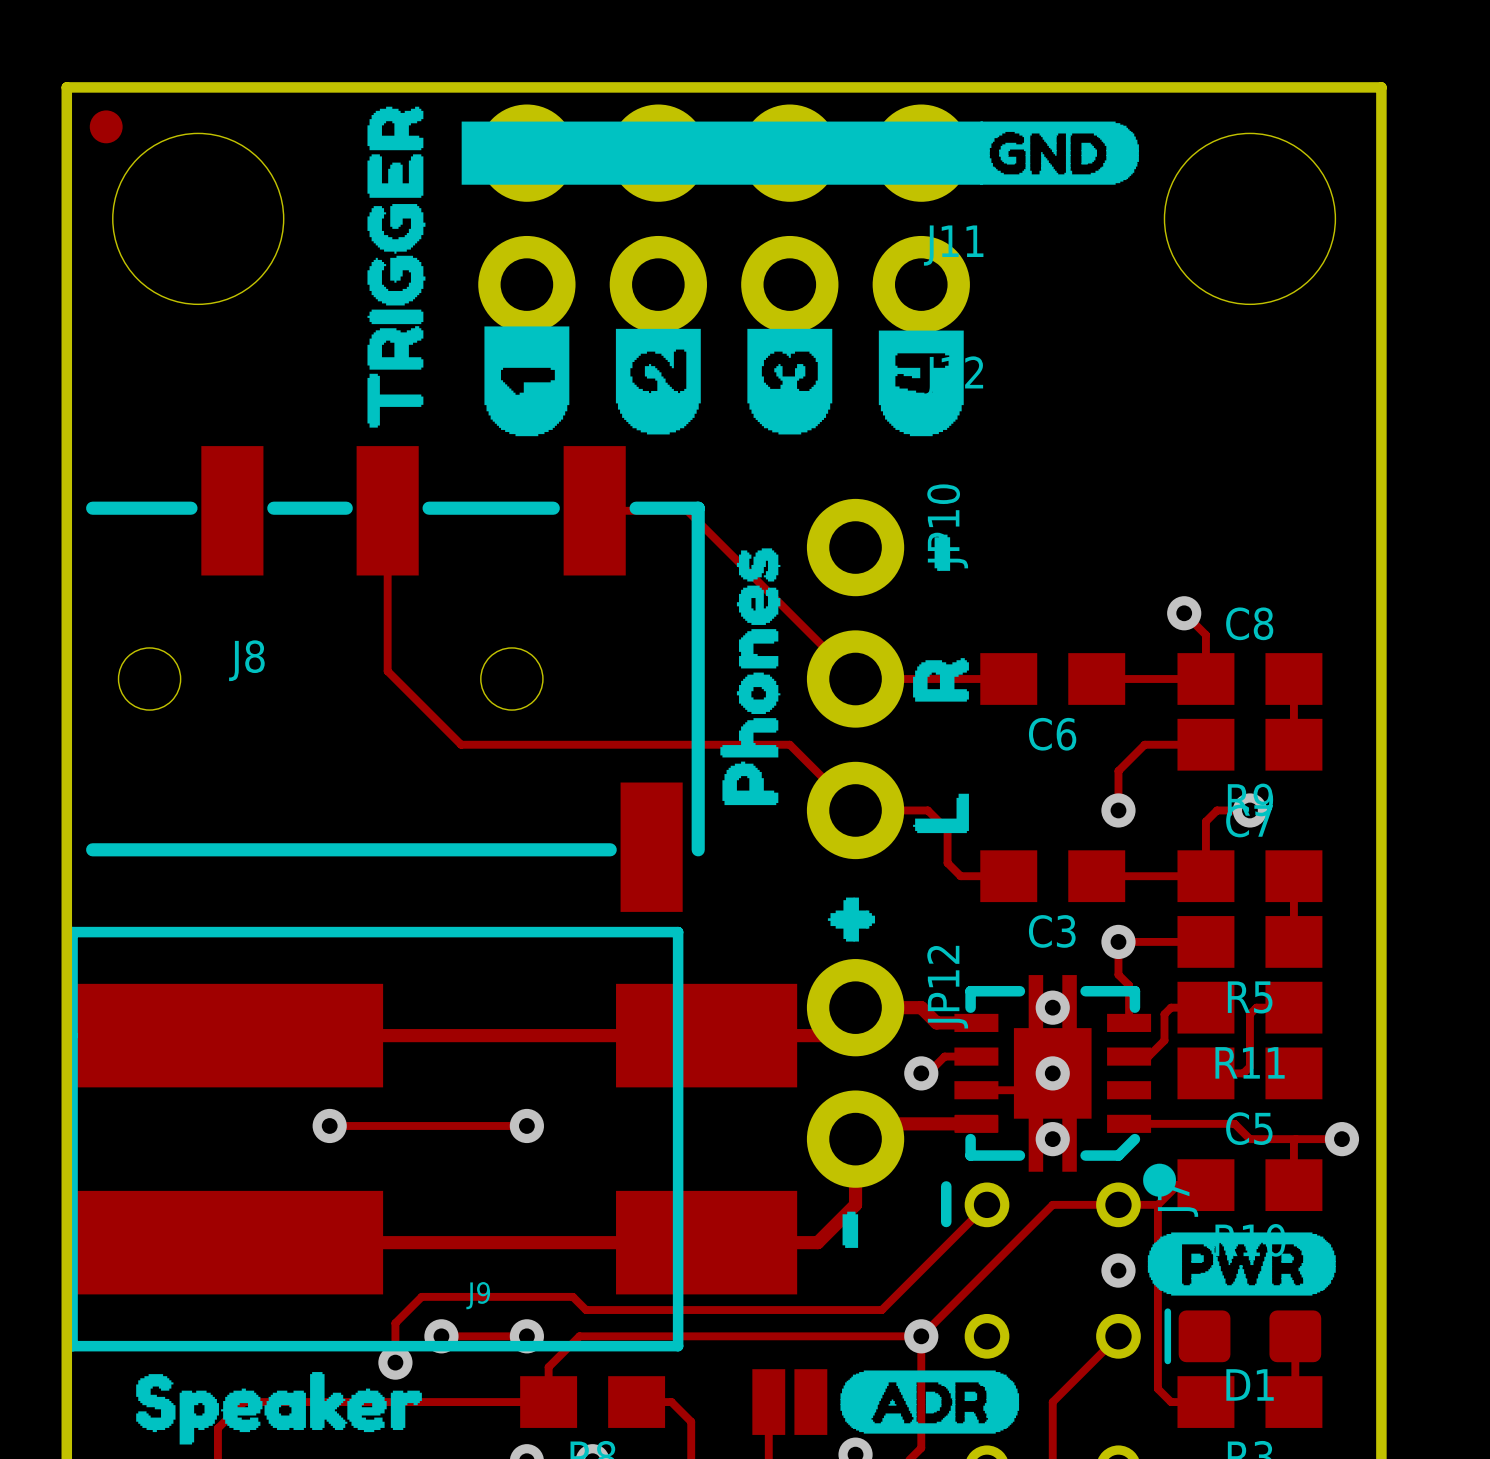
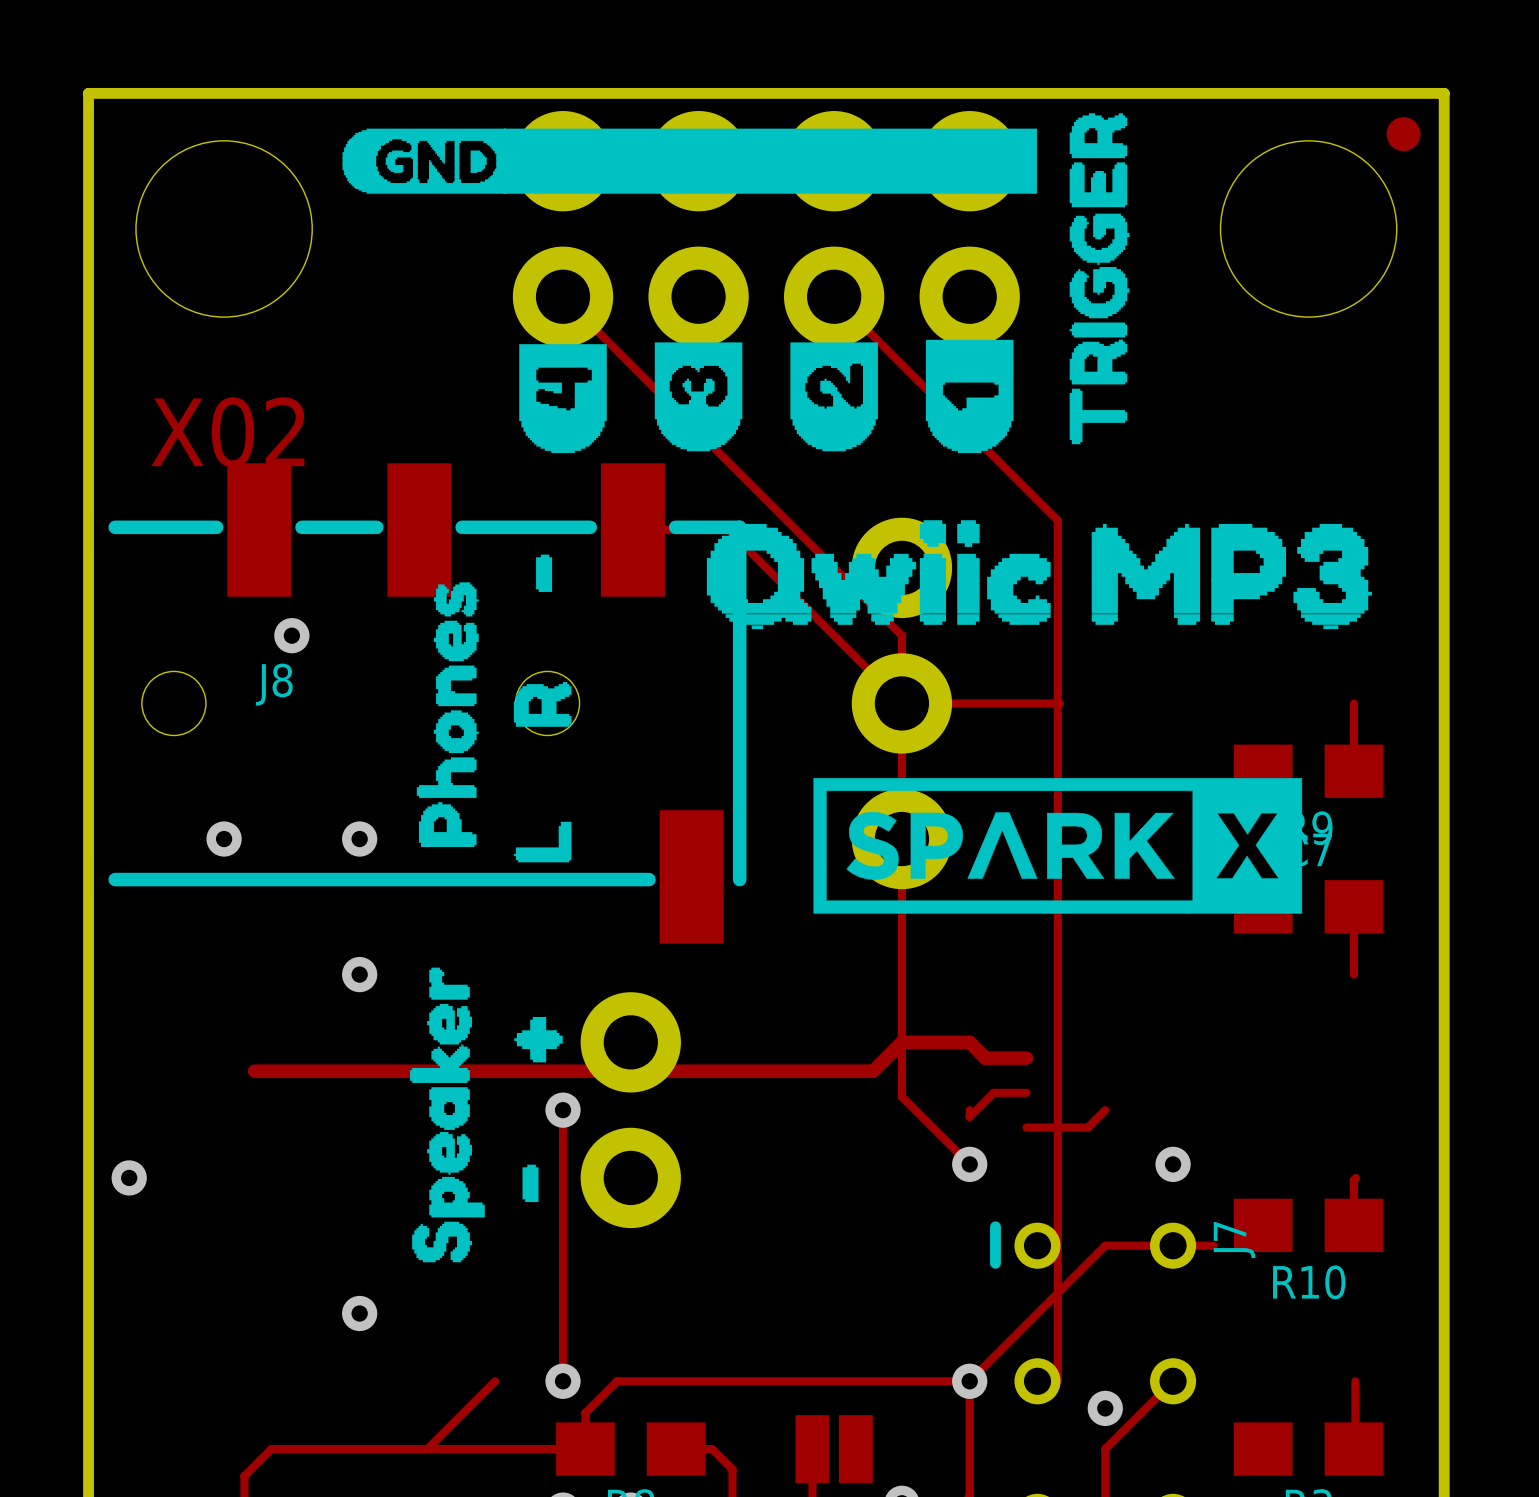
drawing shape: [461, 121, 983, 185] -> [503, 128, 1037, 194]
part position: (106, 126) -> (1403, 134)
drawing position: (1048, 153) -> (436, 161)
drawing position: (396, 267) -> (1099, 278)
track: none -> (563, 296) (901, 635) (901, 1096) (969, 1164)
track: none -> (834, 296) (1057, 520) (1057, 1381)
drawing position: (526, 381) -> (969, 396)
drawing position: (658, 381) -> (834, 396)
drawing position: (789, 381) -> (698, 396)
drawing position: (921, 383) -> (563, 398)
text: none -> X02 (227, 432)
track: (387, 510) (387, 671) (461, 744) (789, 744) (855, 810) (927, 810) (947, 830) (947, 863) (960, 876) (1008, 876) -> none
drawing: none -> [536, 554, 553, 592]
drawing shape: [934, 534, 951, 571] -> [706, 520, 1372, 630]
via: none -> (291, 635)
track: (1184, 613) (1205, 635) (1205, 679) (1096, 679) -> none
via: (1184, 613) -> none
drawing position: (750, 676) -> (447, 714)
drawing position: (941, 679) -> (542, 704)
C6: (1052, 679) -> none
C8: (1249, 679) -> none
track: (1205, 744) (1144, 744) (1118, 771) (1118, 810) -> none
drawing: none -> [813, 777, 1303, 914]
via: none -> (224, 839)
via: none -> (359, 839)
via: (1118, 810) -> none
track: (1249, 810) (1217, 810) (1205, 821) (1205, 876) (1096, 876) -> none
via: (1249, 810) -> none
drawing position: (941, 813) -> (542, 842)
C3: (1052, 876) -> none
drawing position: (851, 919) -> (538, 1039)
drawing: none -> [410, 967, 485, 1263]
via: none -> (359, 974)
via: (1118, 941) -> none
track: (1205, 941) (1118, 941) (1118, 974) (1129, 985) (1129, 1022) -> none
R5: (1249, 941) -> none
via: (1052, 1007) -> none
track: (1205, 1007) (1171, 1007) (1164, 1014) (1164, 1040) (1148, 1056) (1129, 1056) -> none
R11: (1249, 1007) -> none
track: (1293, 1007) (1256, 1007) (1249, 1014) (1249, 1066) (1243, 1073) (1205, 1073) -> none
JP12 position: (855, 1073) -> (630, 1110)
via position: (921, 1073) -> (969, 1164)
via: (1052, 1073) -> none
C5: (1249, 1073) -> none
part: (1065, 1085) -> none
track: (976, 1123) (870, 1123) (855, 1139) (855, 1204) (817, 1242) (227, 1242) -> none
track: (1129, 1123) (1234, 1123) (1249, 1139) (1341, 1139) -> none
track: (329, 1125) (526, 1125) -> none
via: (329, 1125) -> none
via position: (526, 1125) -> (563, 1110)
via: none -> (1173, 1164)
via: none -> (129, 1177)
J9: (432, 1139) -> none
via: (1052, 1139) -> none
via: (1341, 1139) -> none
track: (1205, 1185) (1177, 1185) (1157, 1204) (1157, 1388) (1171, 1402) (1205, 1402) -> none
track: (987, 1204) (881, 1310) (586, 1310) (572, 1296) (421, 1296) (395, 1323) (395, 1362) -> none
drawing position: (850, 1229) -> (530, 1183)
drawing: [1147, 1232, 1336, 1296] -> none
via: none -> (359, 1313)
via: (1118, 1270) -> none
track: (441, 1336) (526, 1336) -> (563, 1110) (563, 1381)
via: (441, 1336) -> none
track: none -> (495, 1381) (427, 1449)
D1: (1242, 1336) -> none
via: (395, 1362) -> none
via: none -> (1105, 1408)
drawing: [840, 1370, 1020, 1434] -> none
drawing: [136, 1372, 422, 1445] -> none

